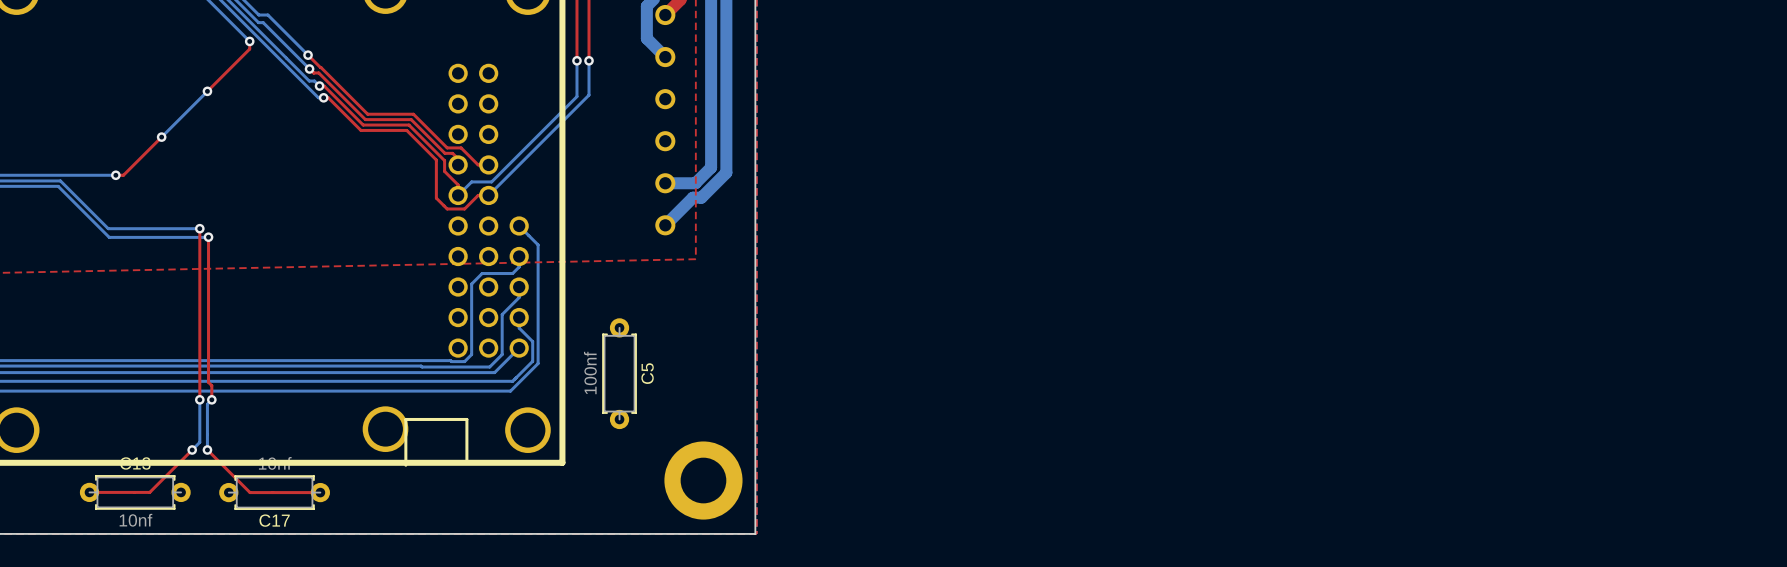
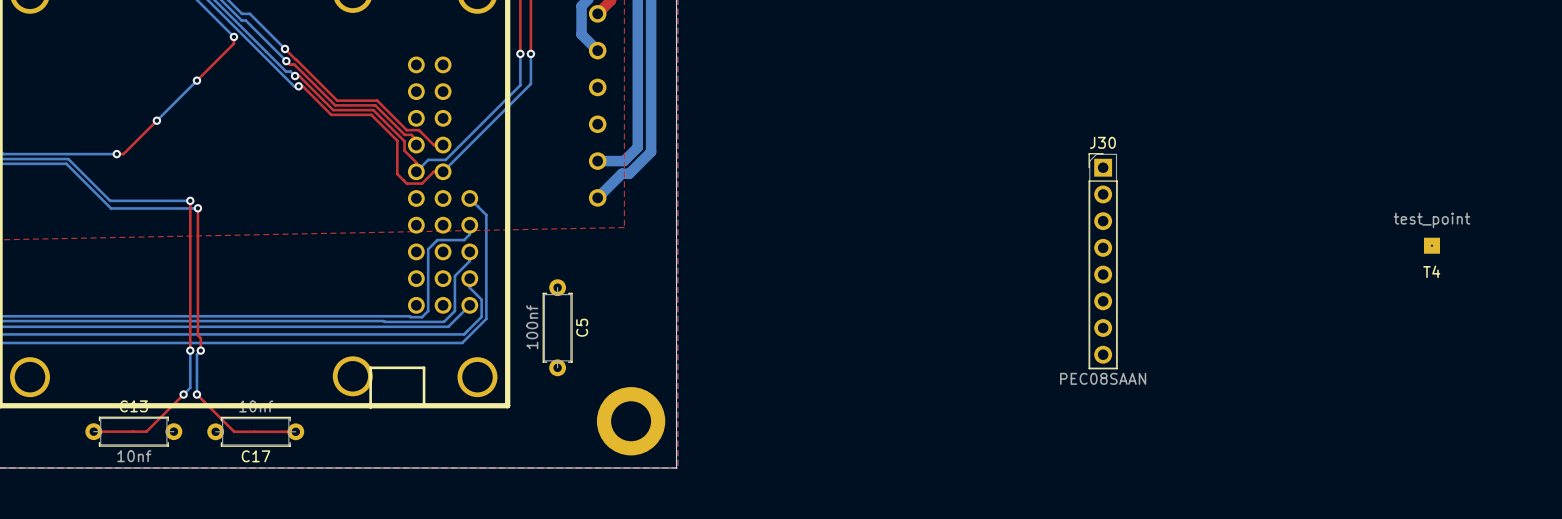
T4: none -> test_point (1431, 245)
J30: none -> PEC08SAAN (1103, 261)

